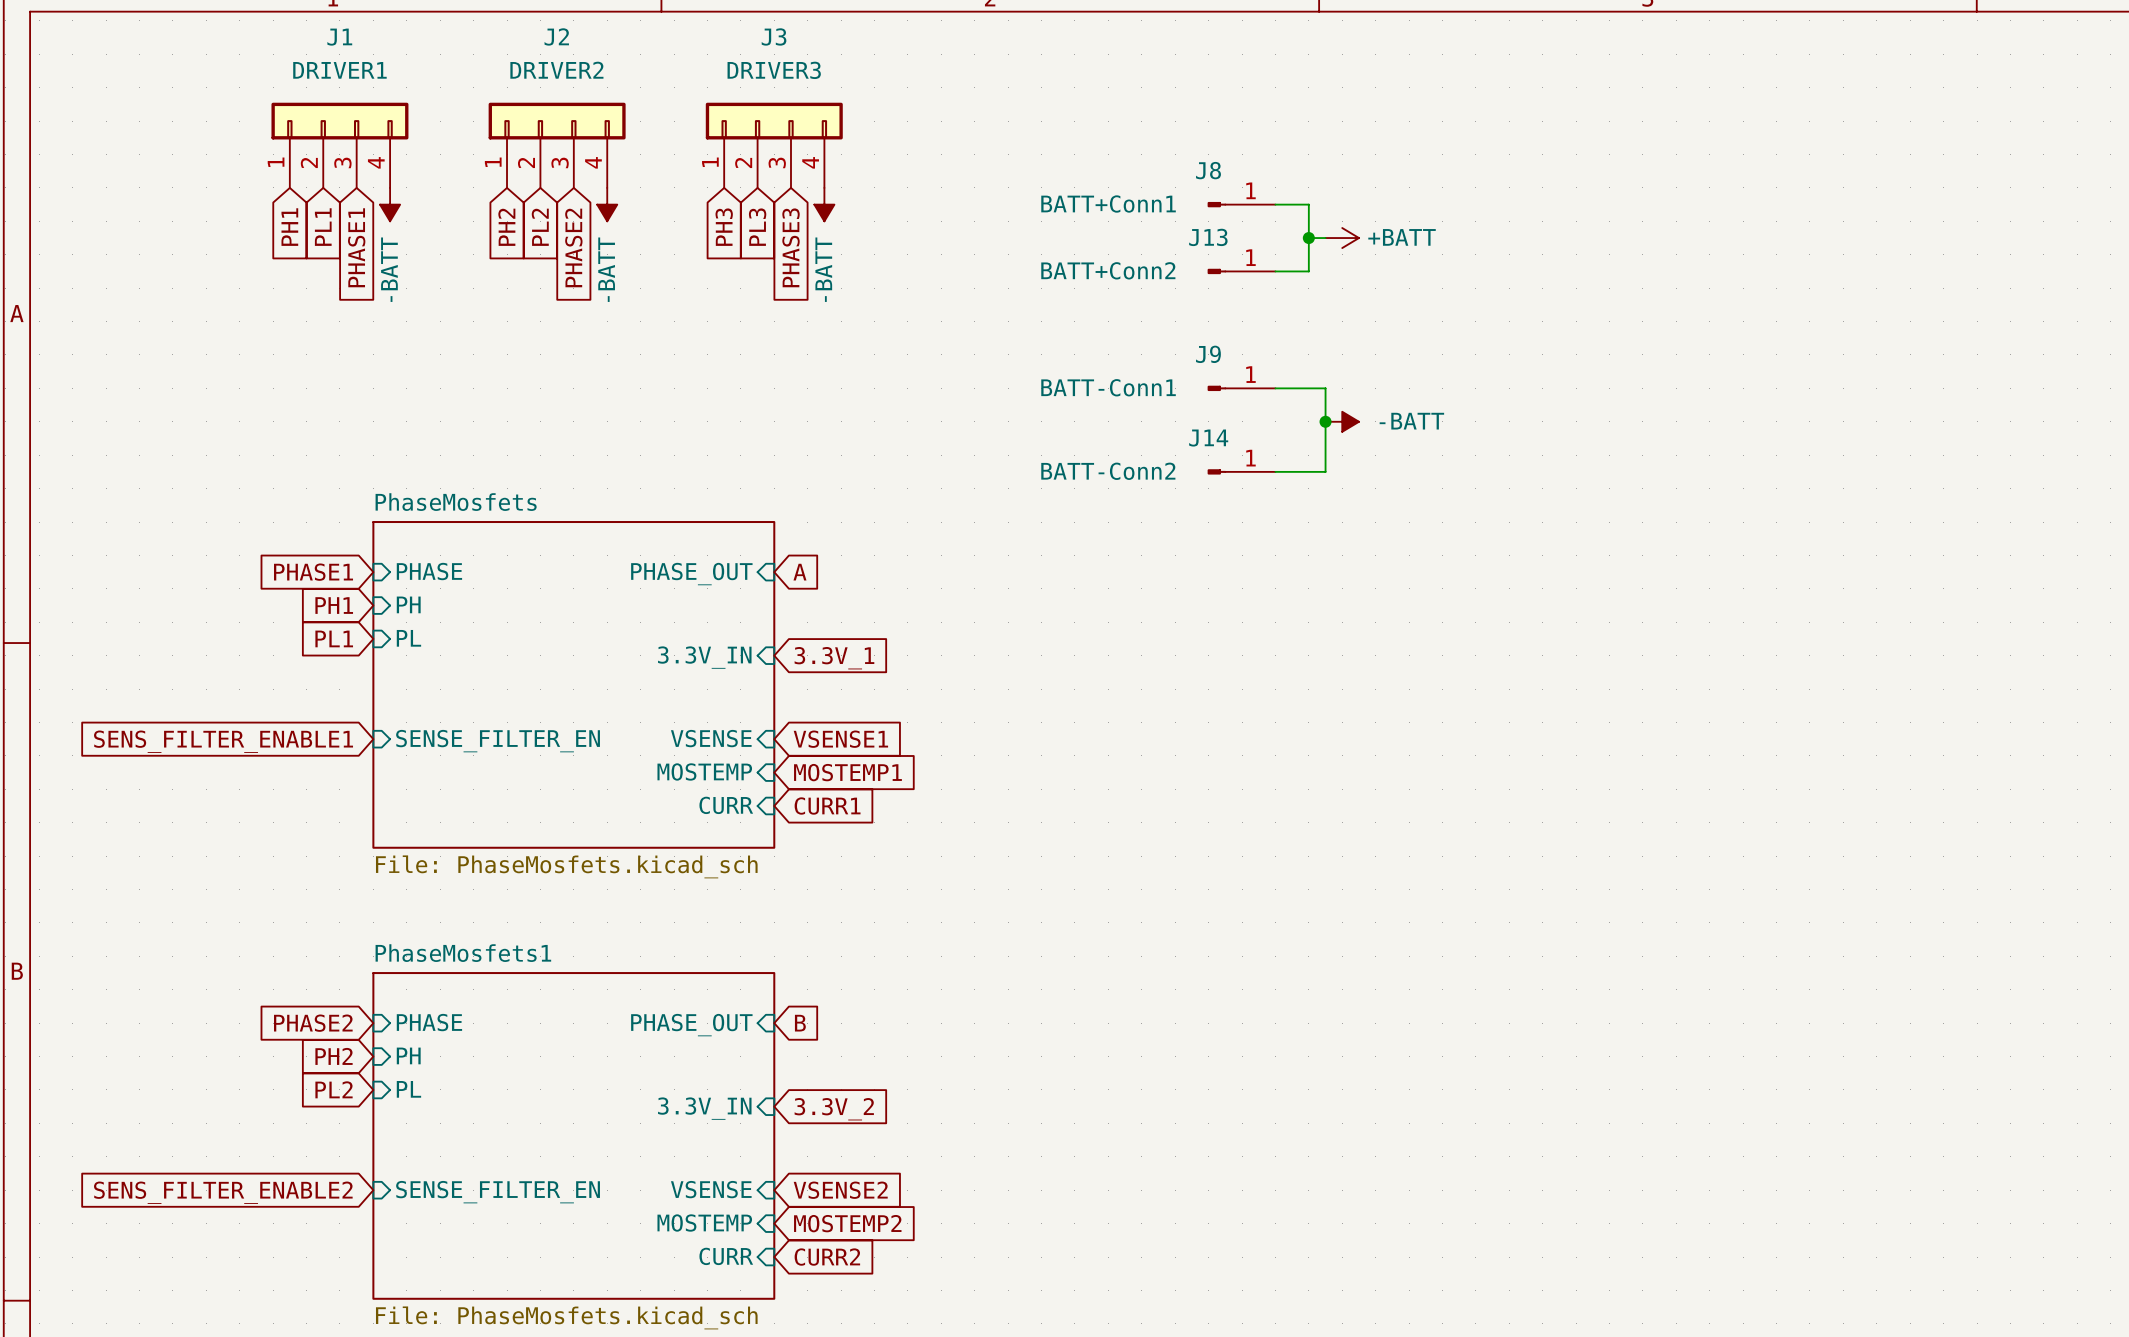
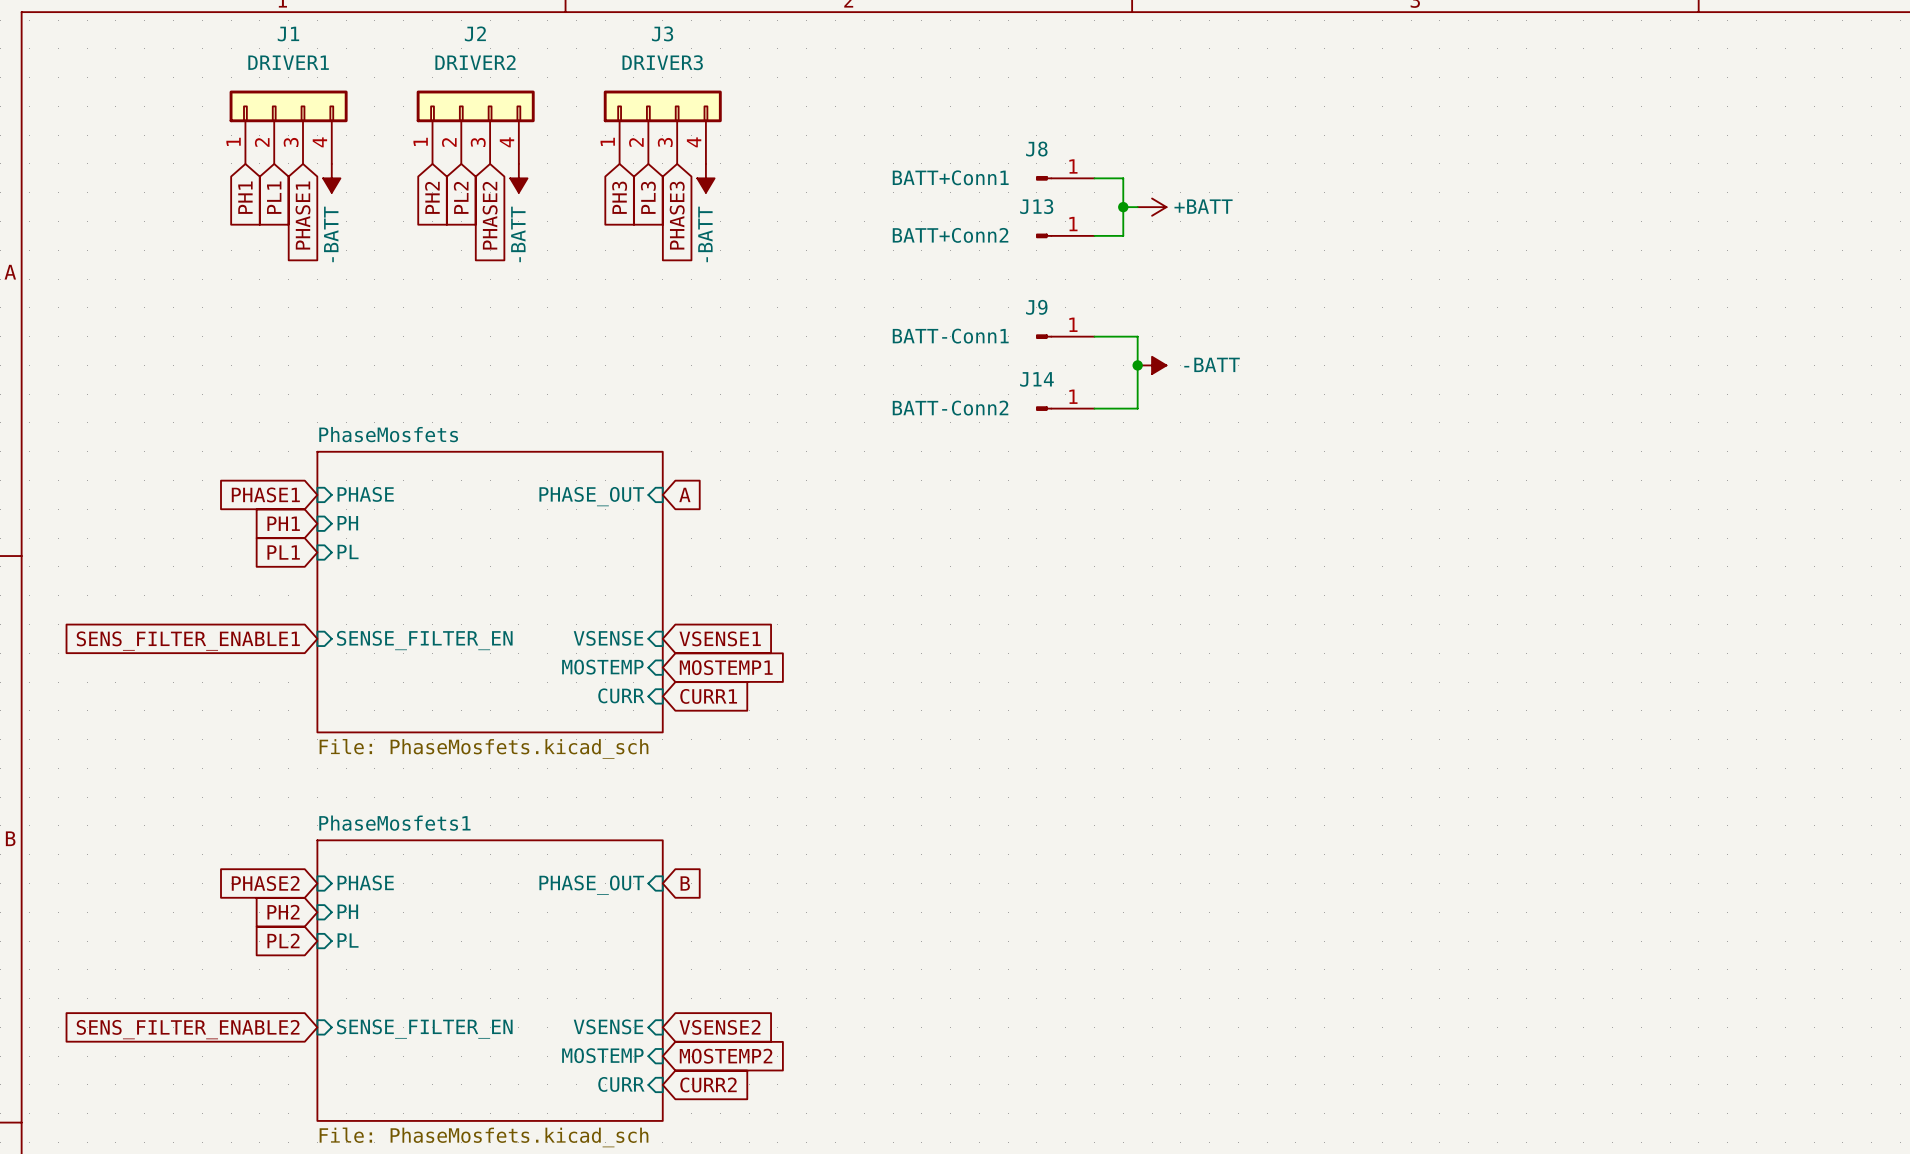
sheet pin: 3.3V_IN (704, 657) -> none
global label: 3.3V_1 (834, 658) -> none
sheet pin: 3.3V_IN (704, 1108) -> none
global label: 3.3V_2 (834, 1109) -> none

